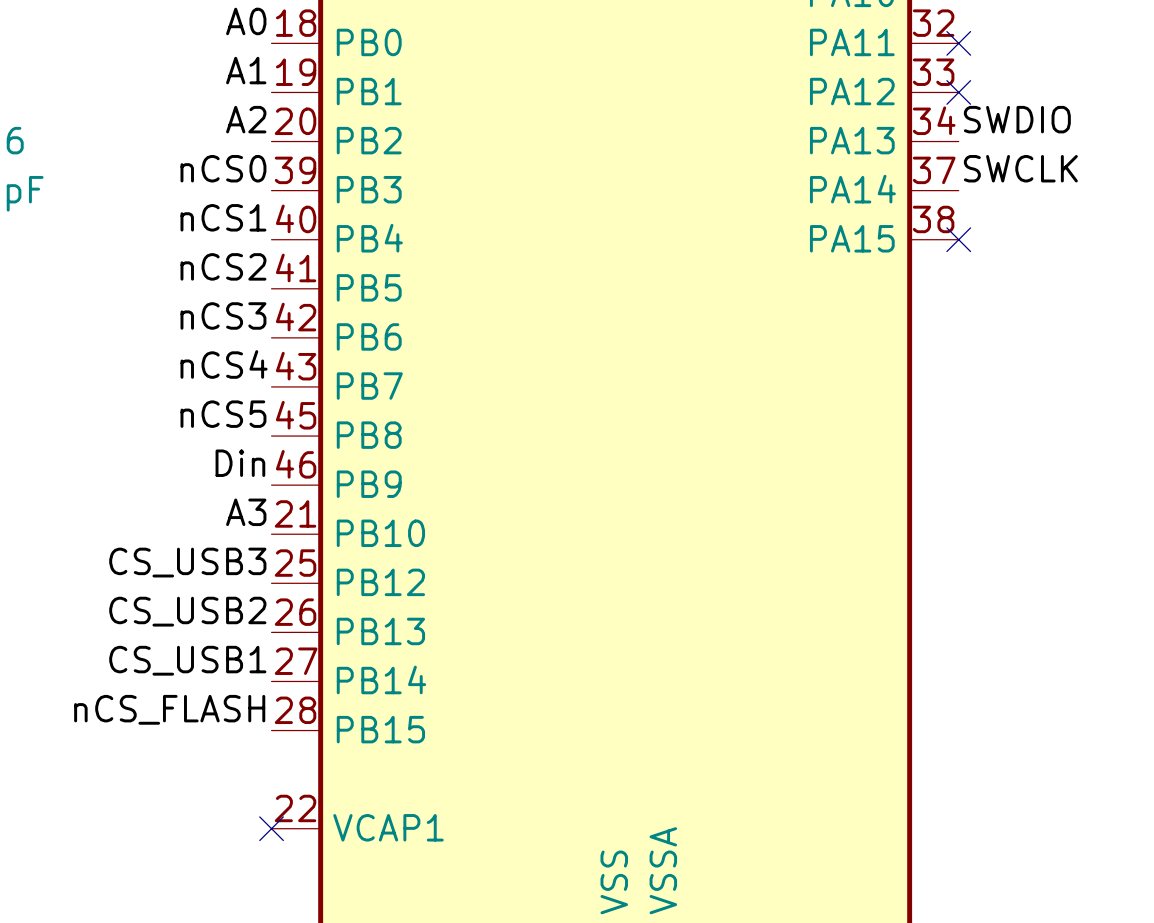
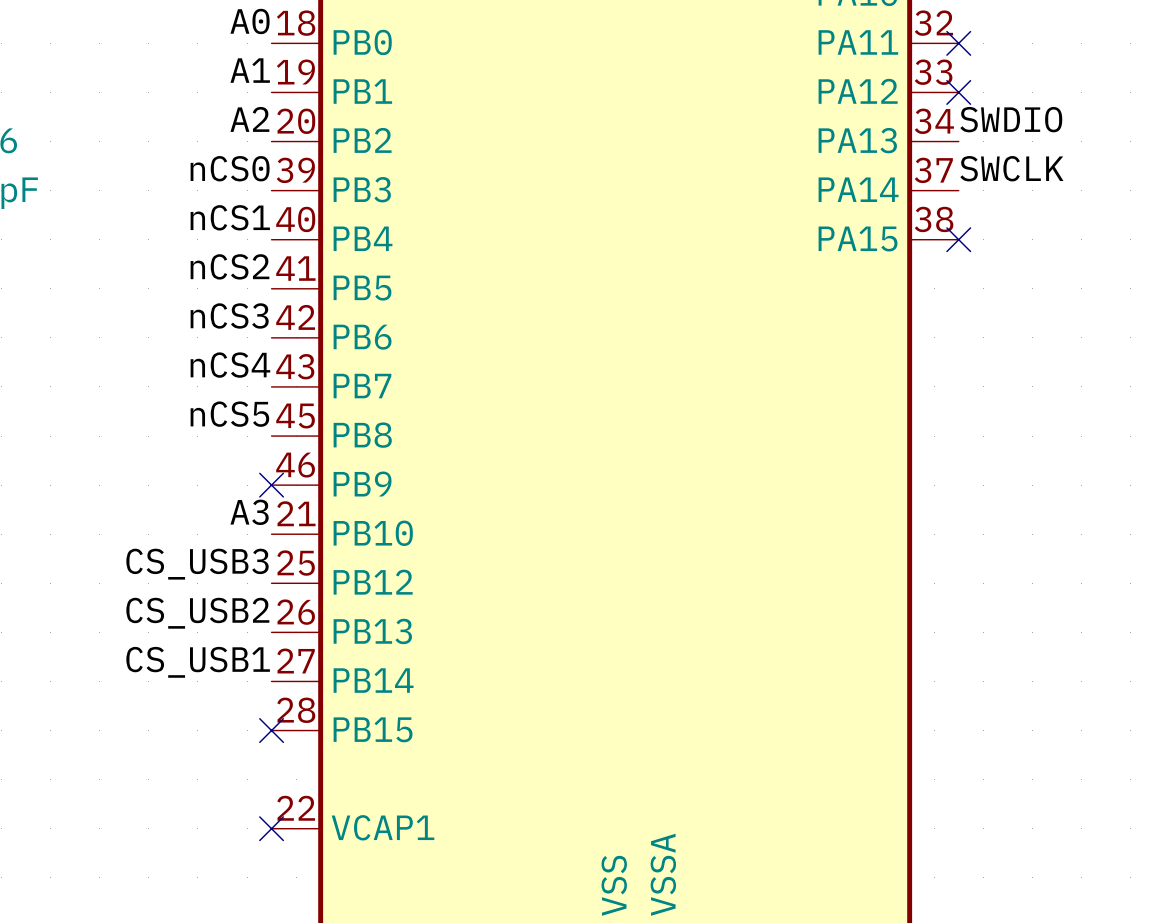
label: Din (240, 463) -> none
no-connect mark: none -> (271, 485)
label: nCS_FLASH (169, 709) -> none
no-connect mark: none -> (271, 730)

